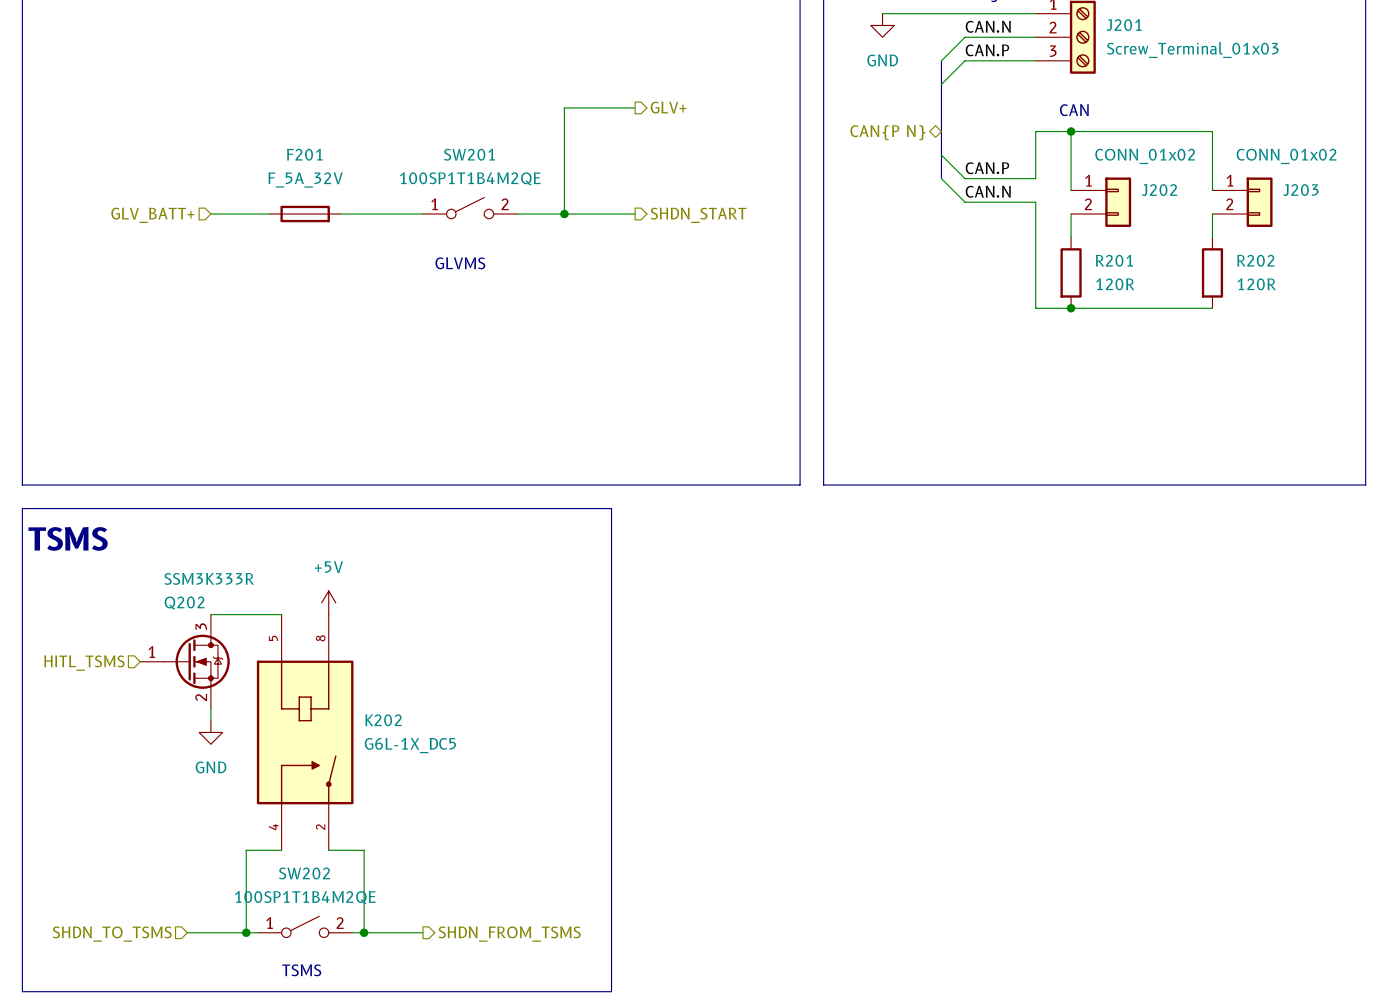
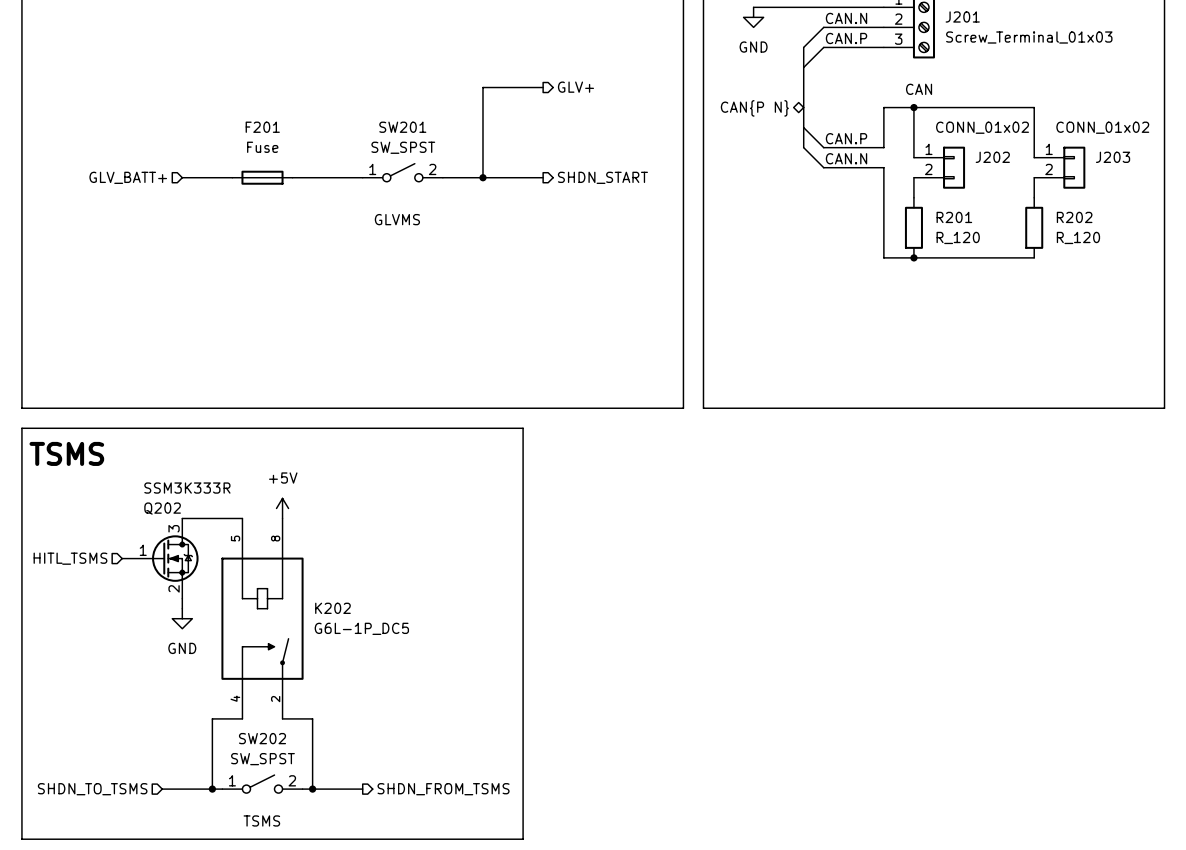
SW201 value: 100SP1T1B4M2QE (470, 178) -> SW_SPST (403, 147)
F201 value: F_5A_32V (305, 179) -> Fuse (262, 147)
R201 value: 120R (1115, 284) -> R_120 (958, 237)
R202 value: 120R (1256, 284) -> R_120 (1078, 237)
Q202 symbol: [140, 614, 230, 709] -> [122, 518, 199, 599]
K202 value: G6L-1X_DC5 (410, 745) -> G6L-1P_DC5 (361, 628)
SW202 value: 100SP1T1B4M2QE (305, 897) -> SW_SPST (262, 759)

